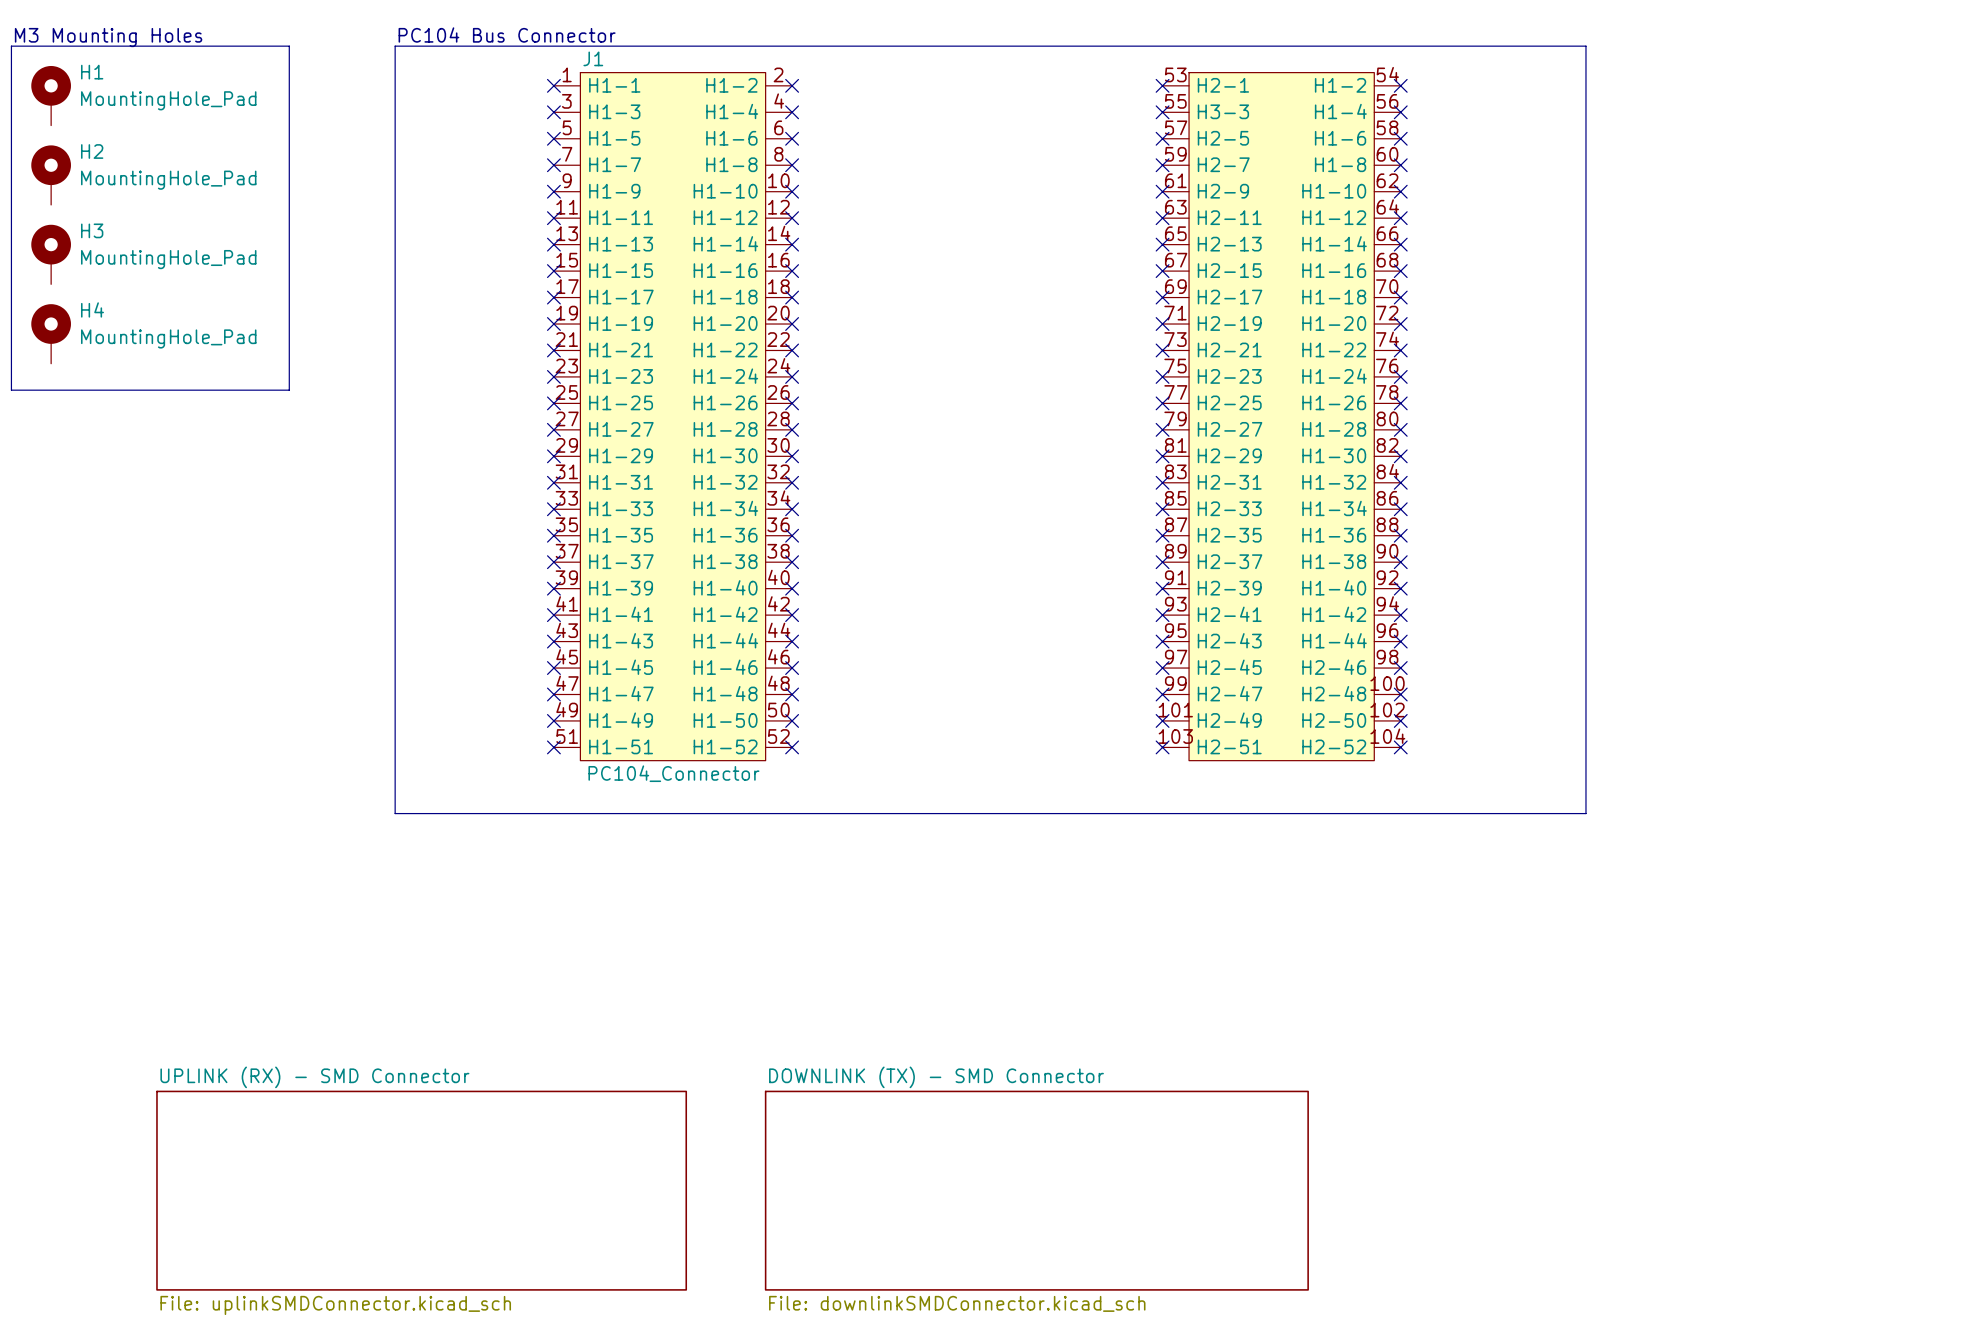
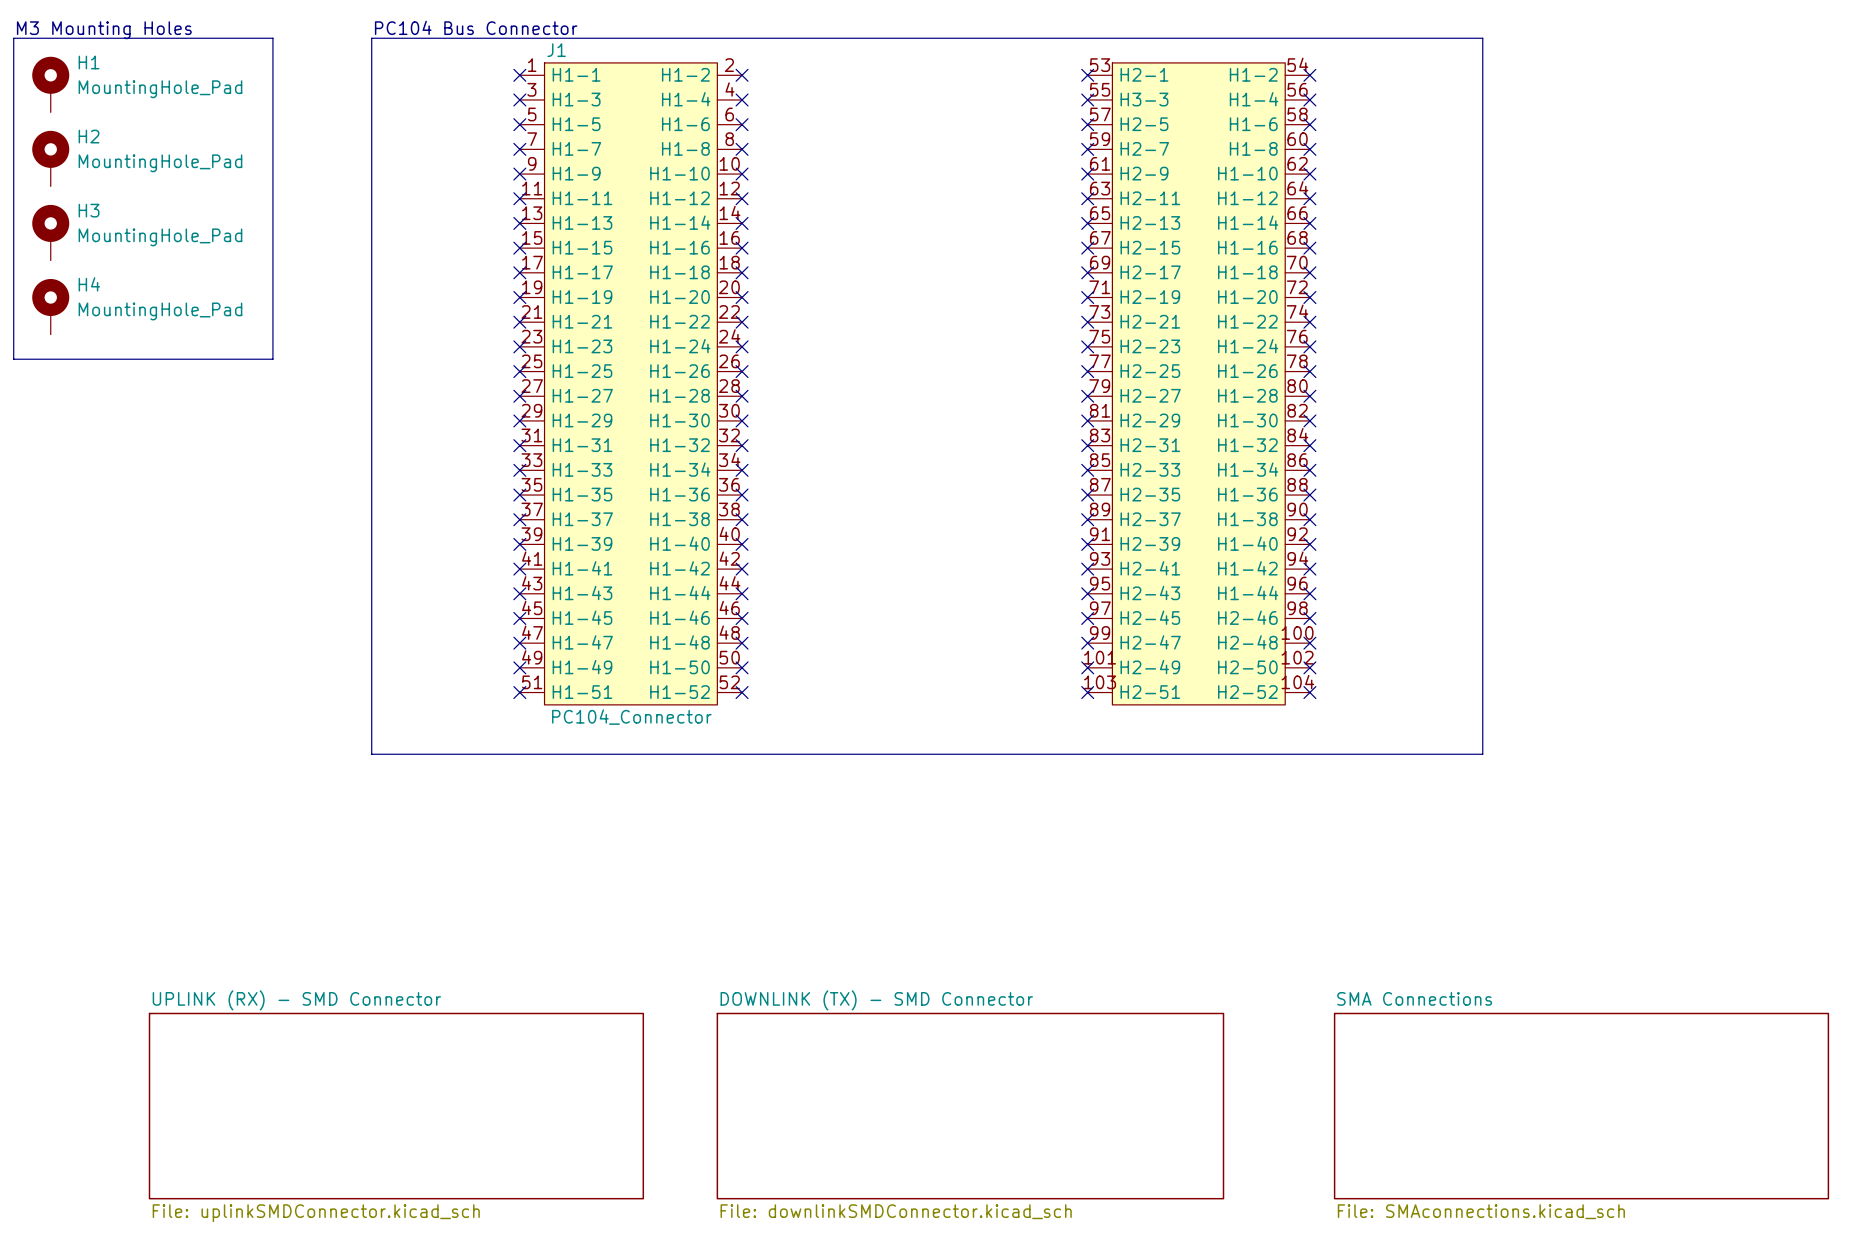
sheet SMA Connections: none -> File: SMAconnections.kicad_sch (1581, 1106)

